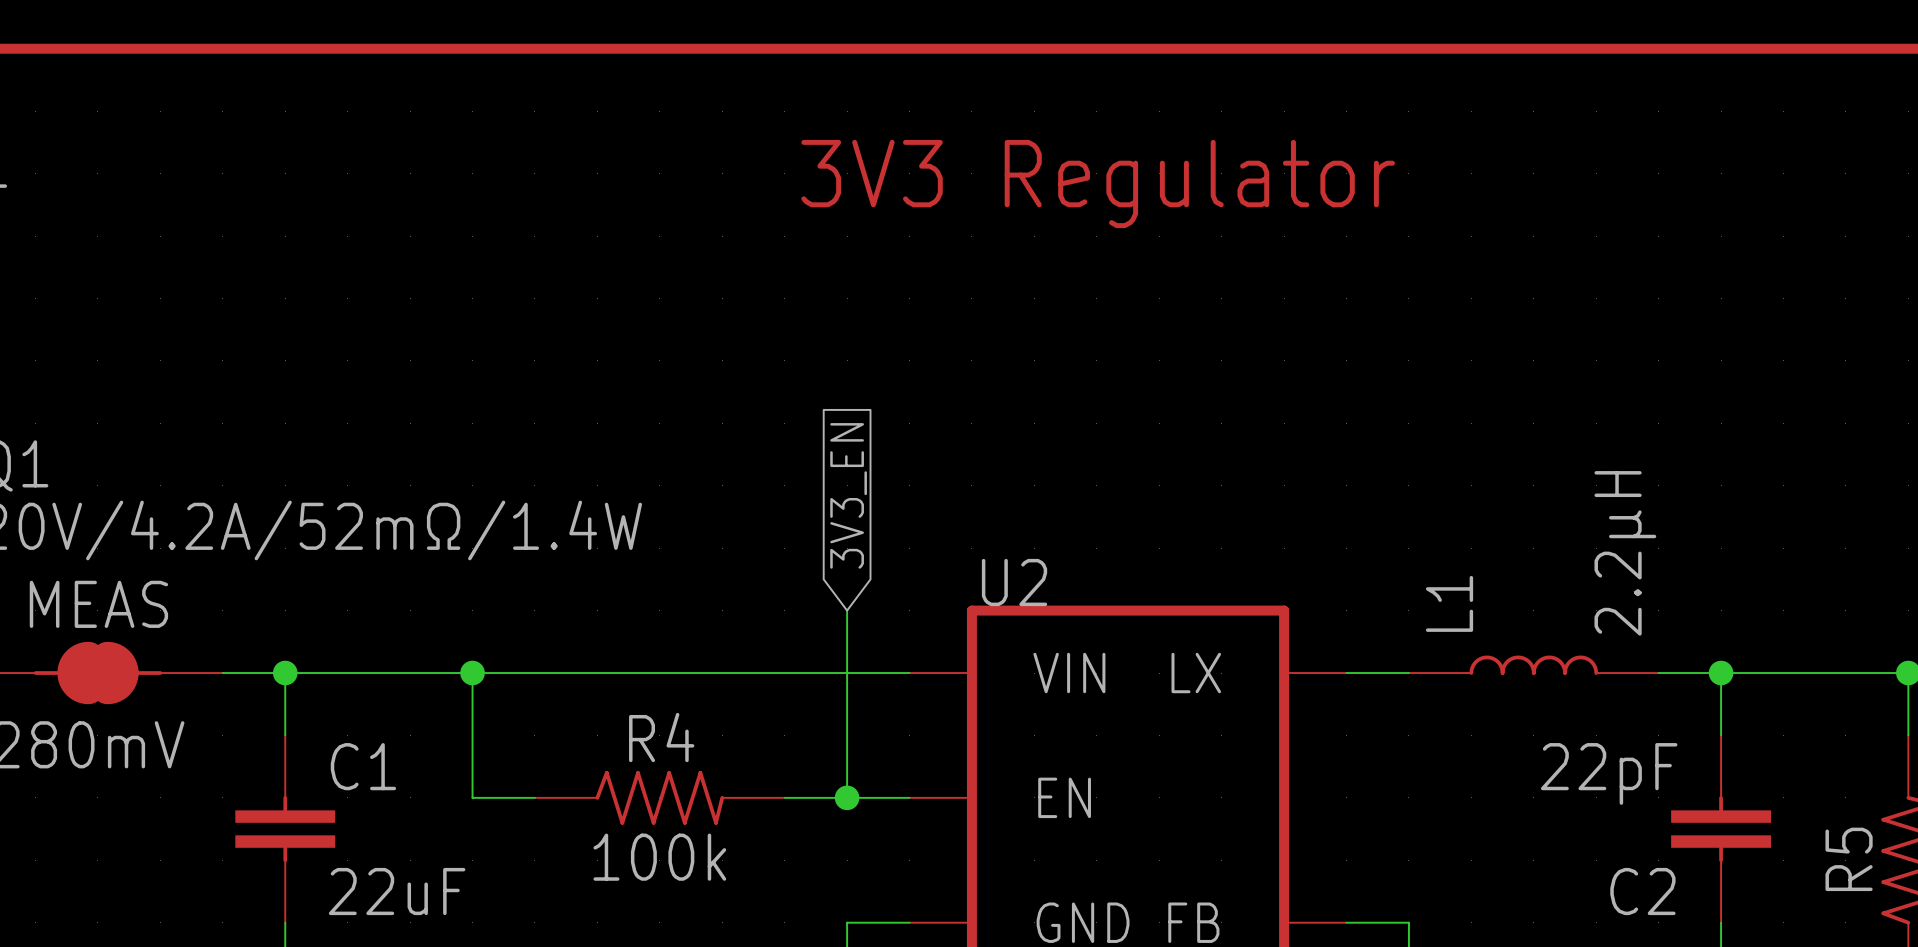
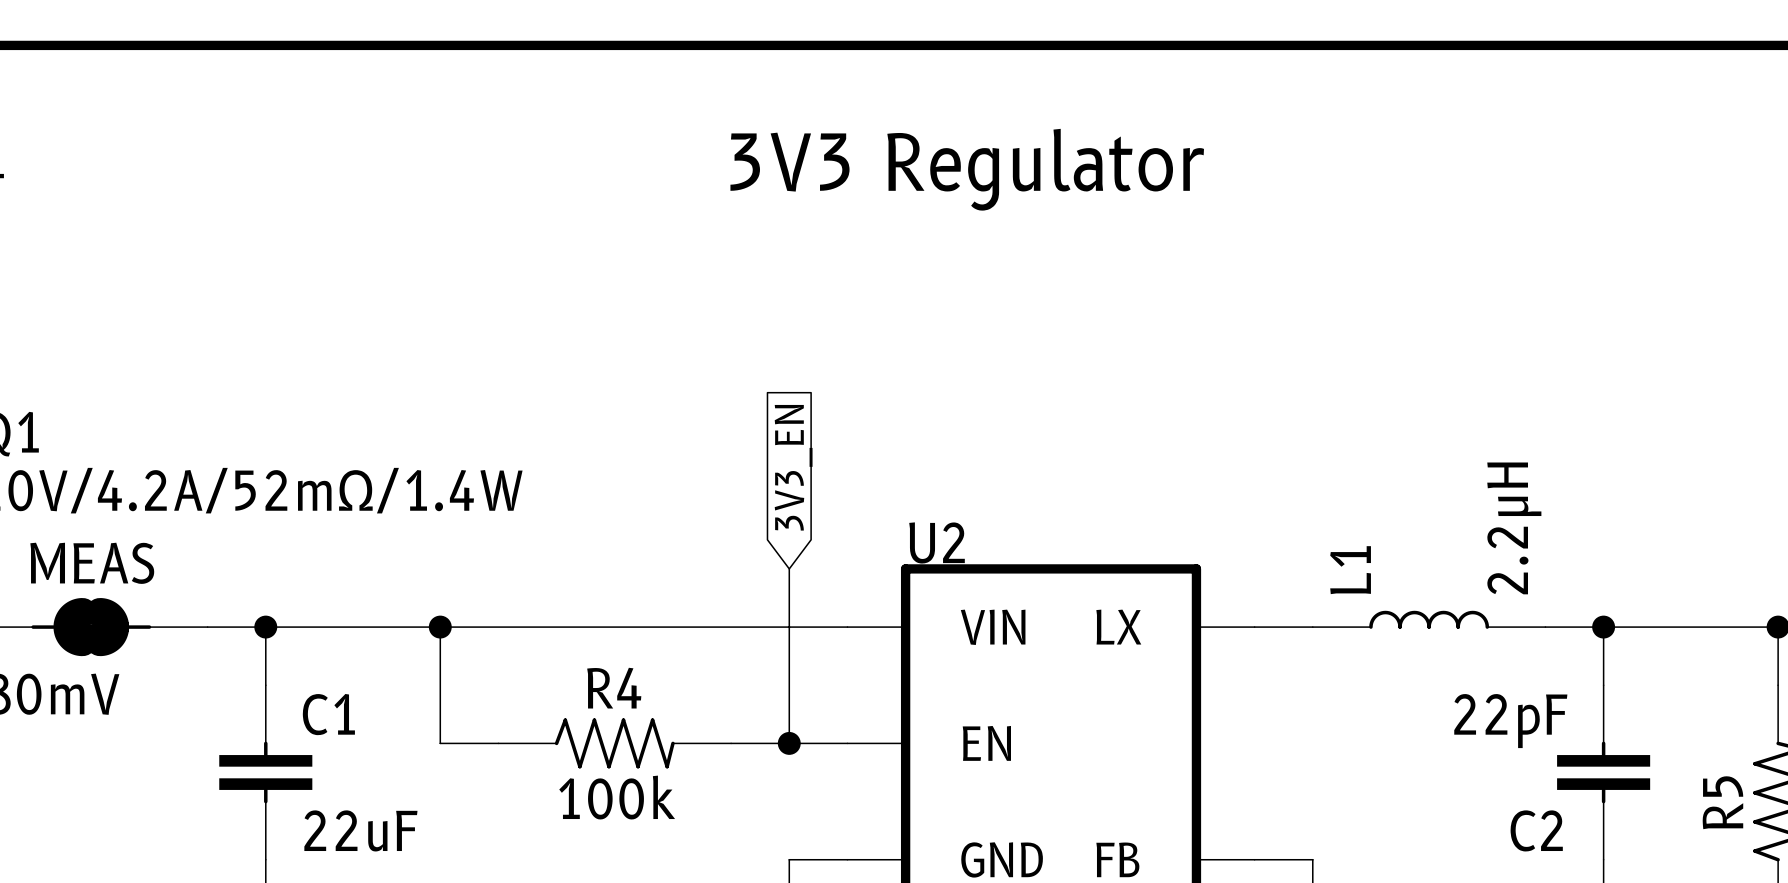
text position: 3V3 Regulator (1098, 184) -> 3V3 Regulator (967, 169)

